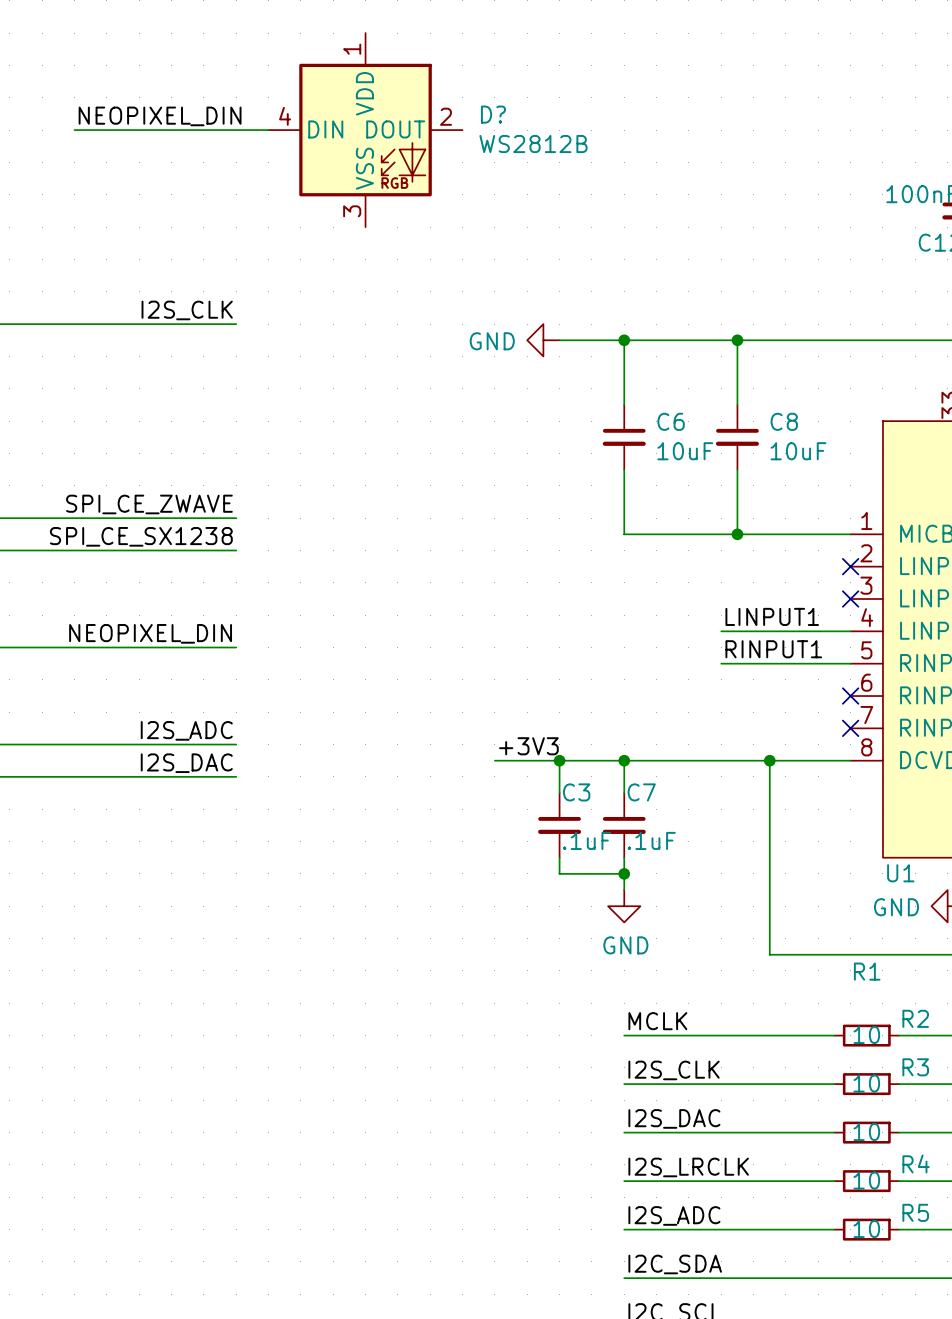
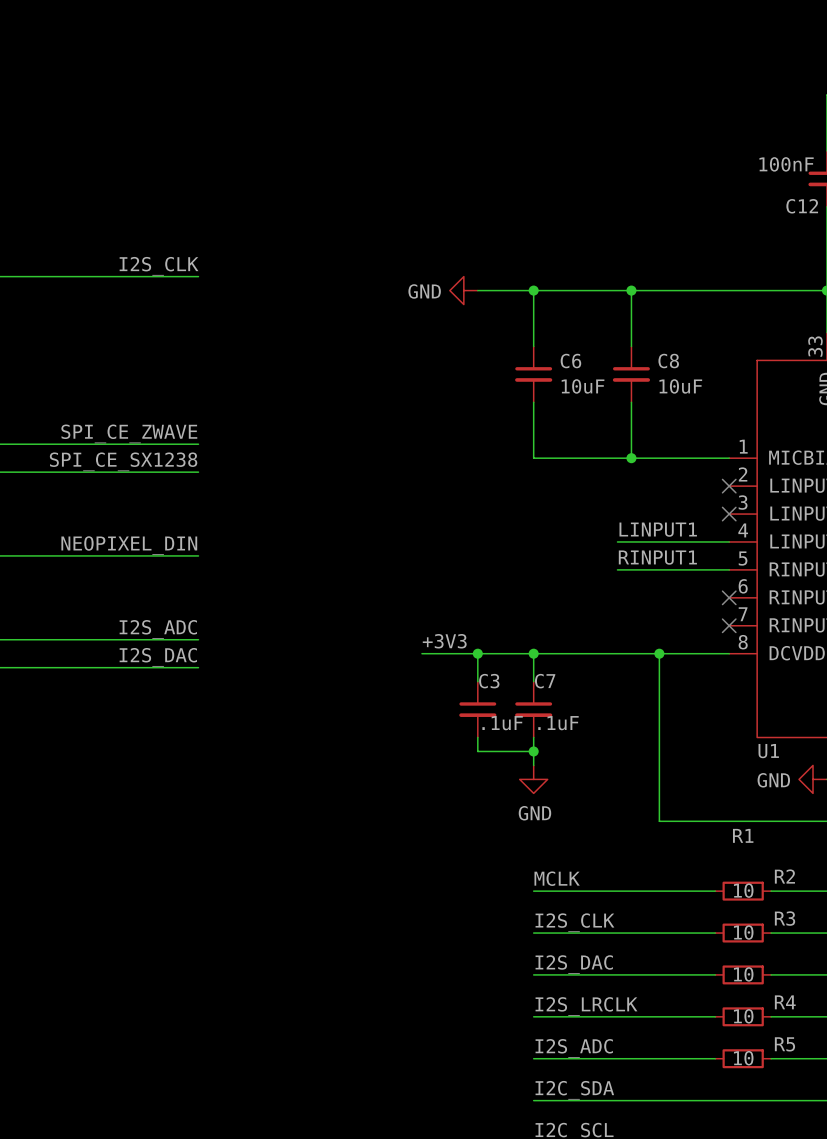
label: NEOPIXEL_DIN (160, 116) -> none
wire: (74, 130) (268, 130) -> none
D?: WS2812B (365, 130) -> none

